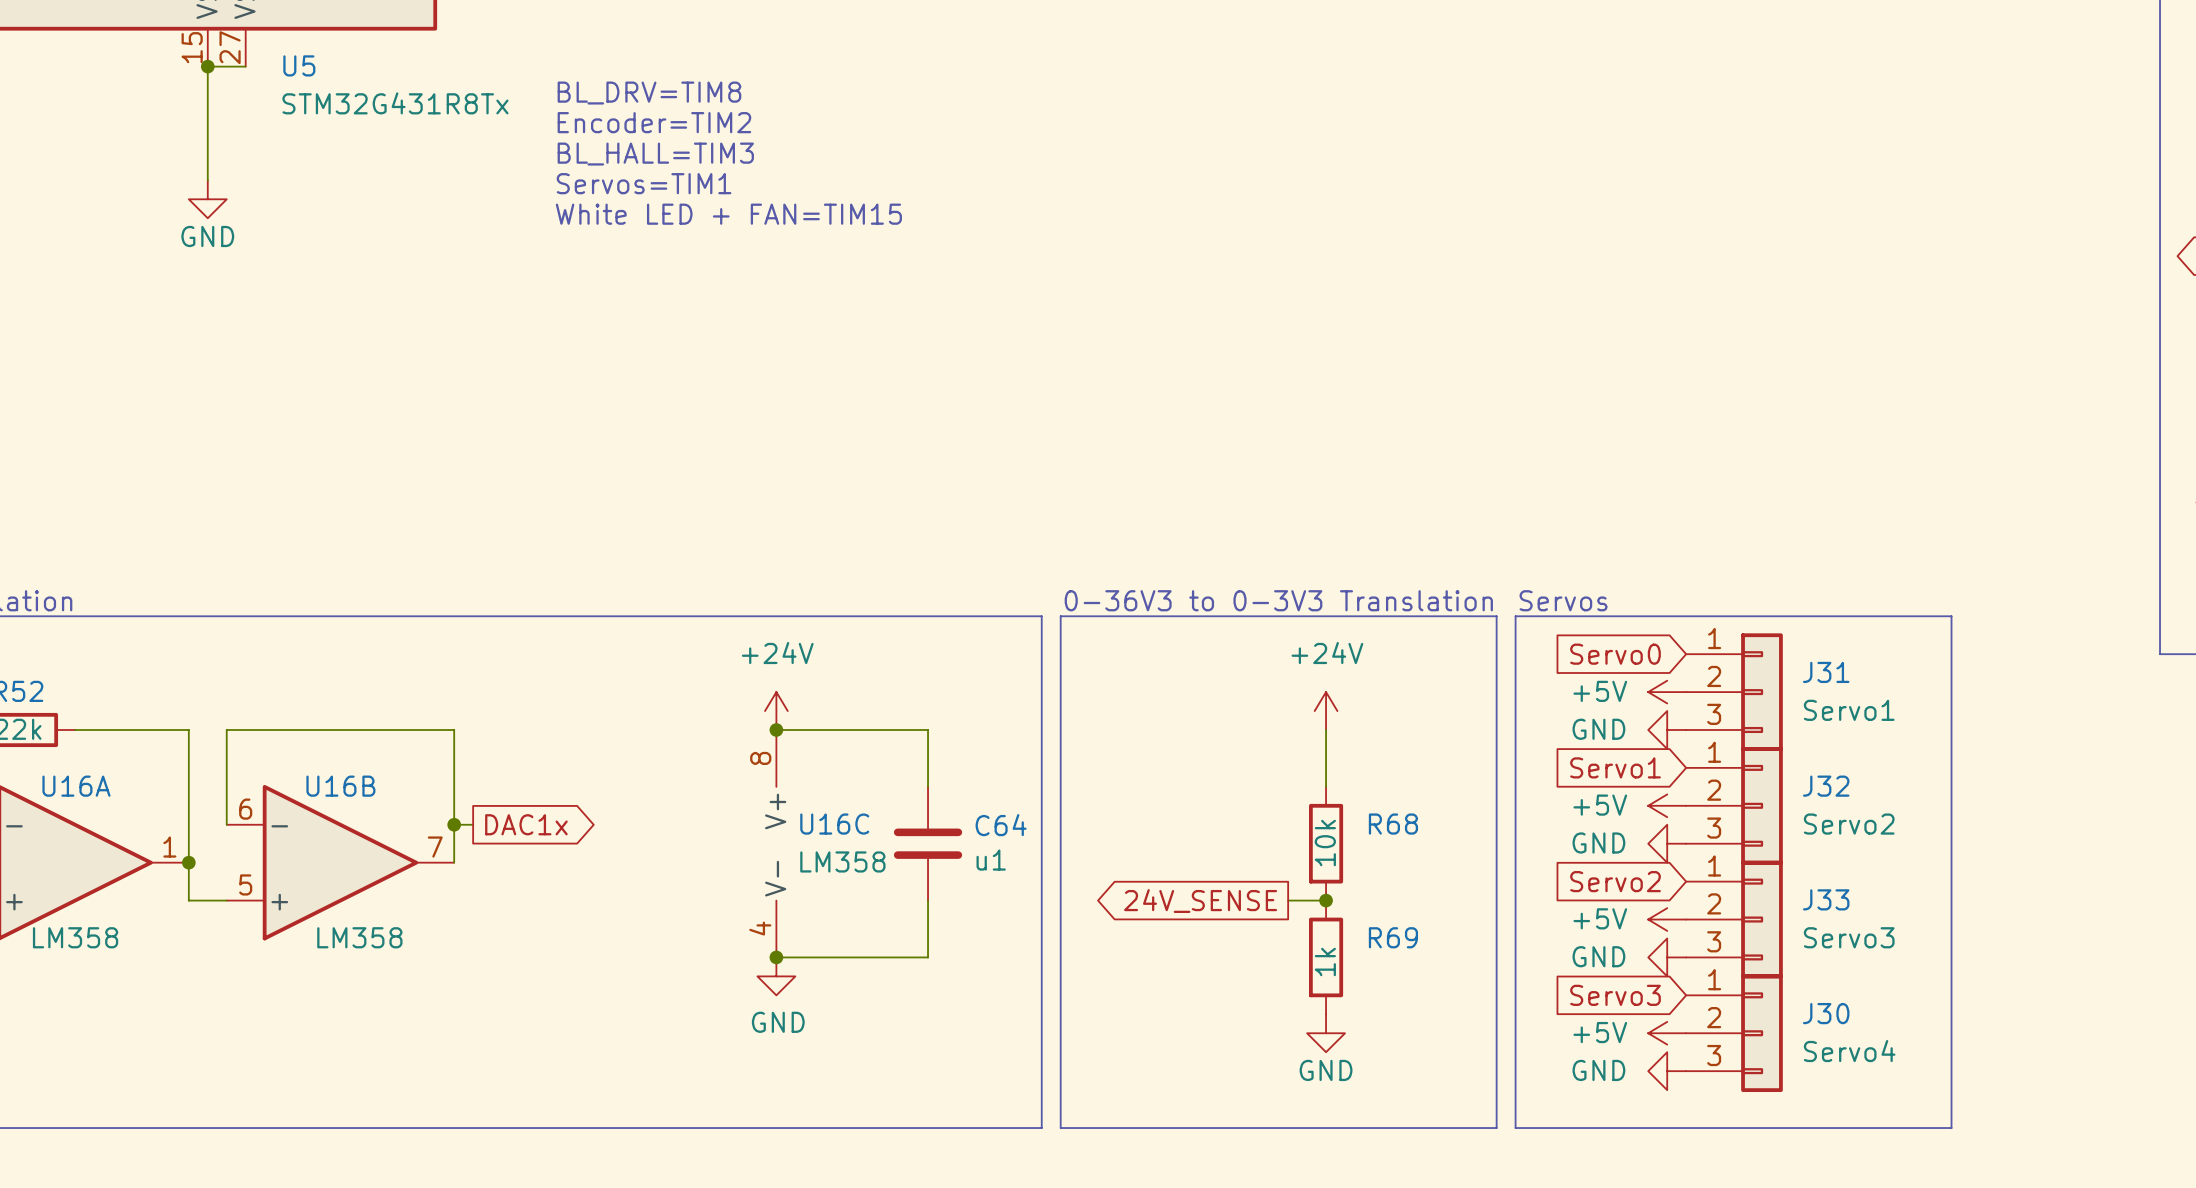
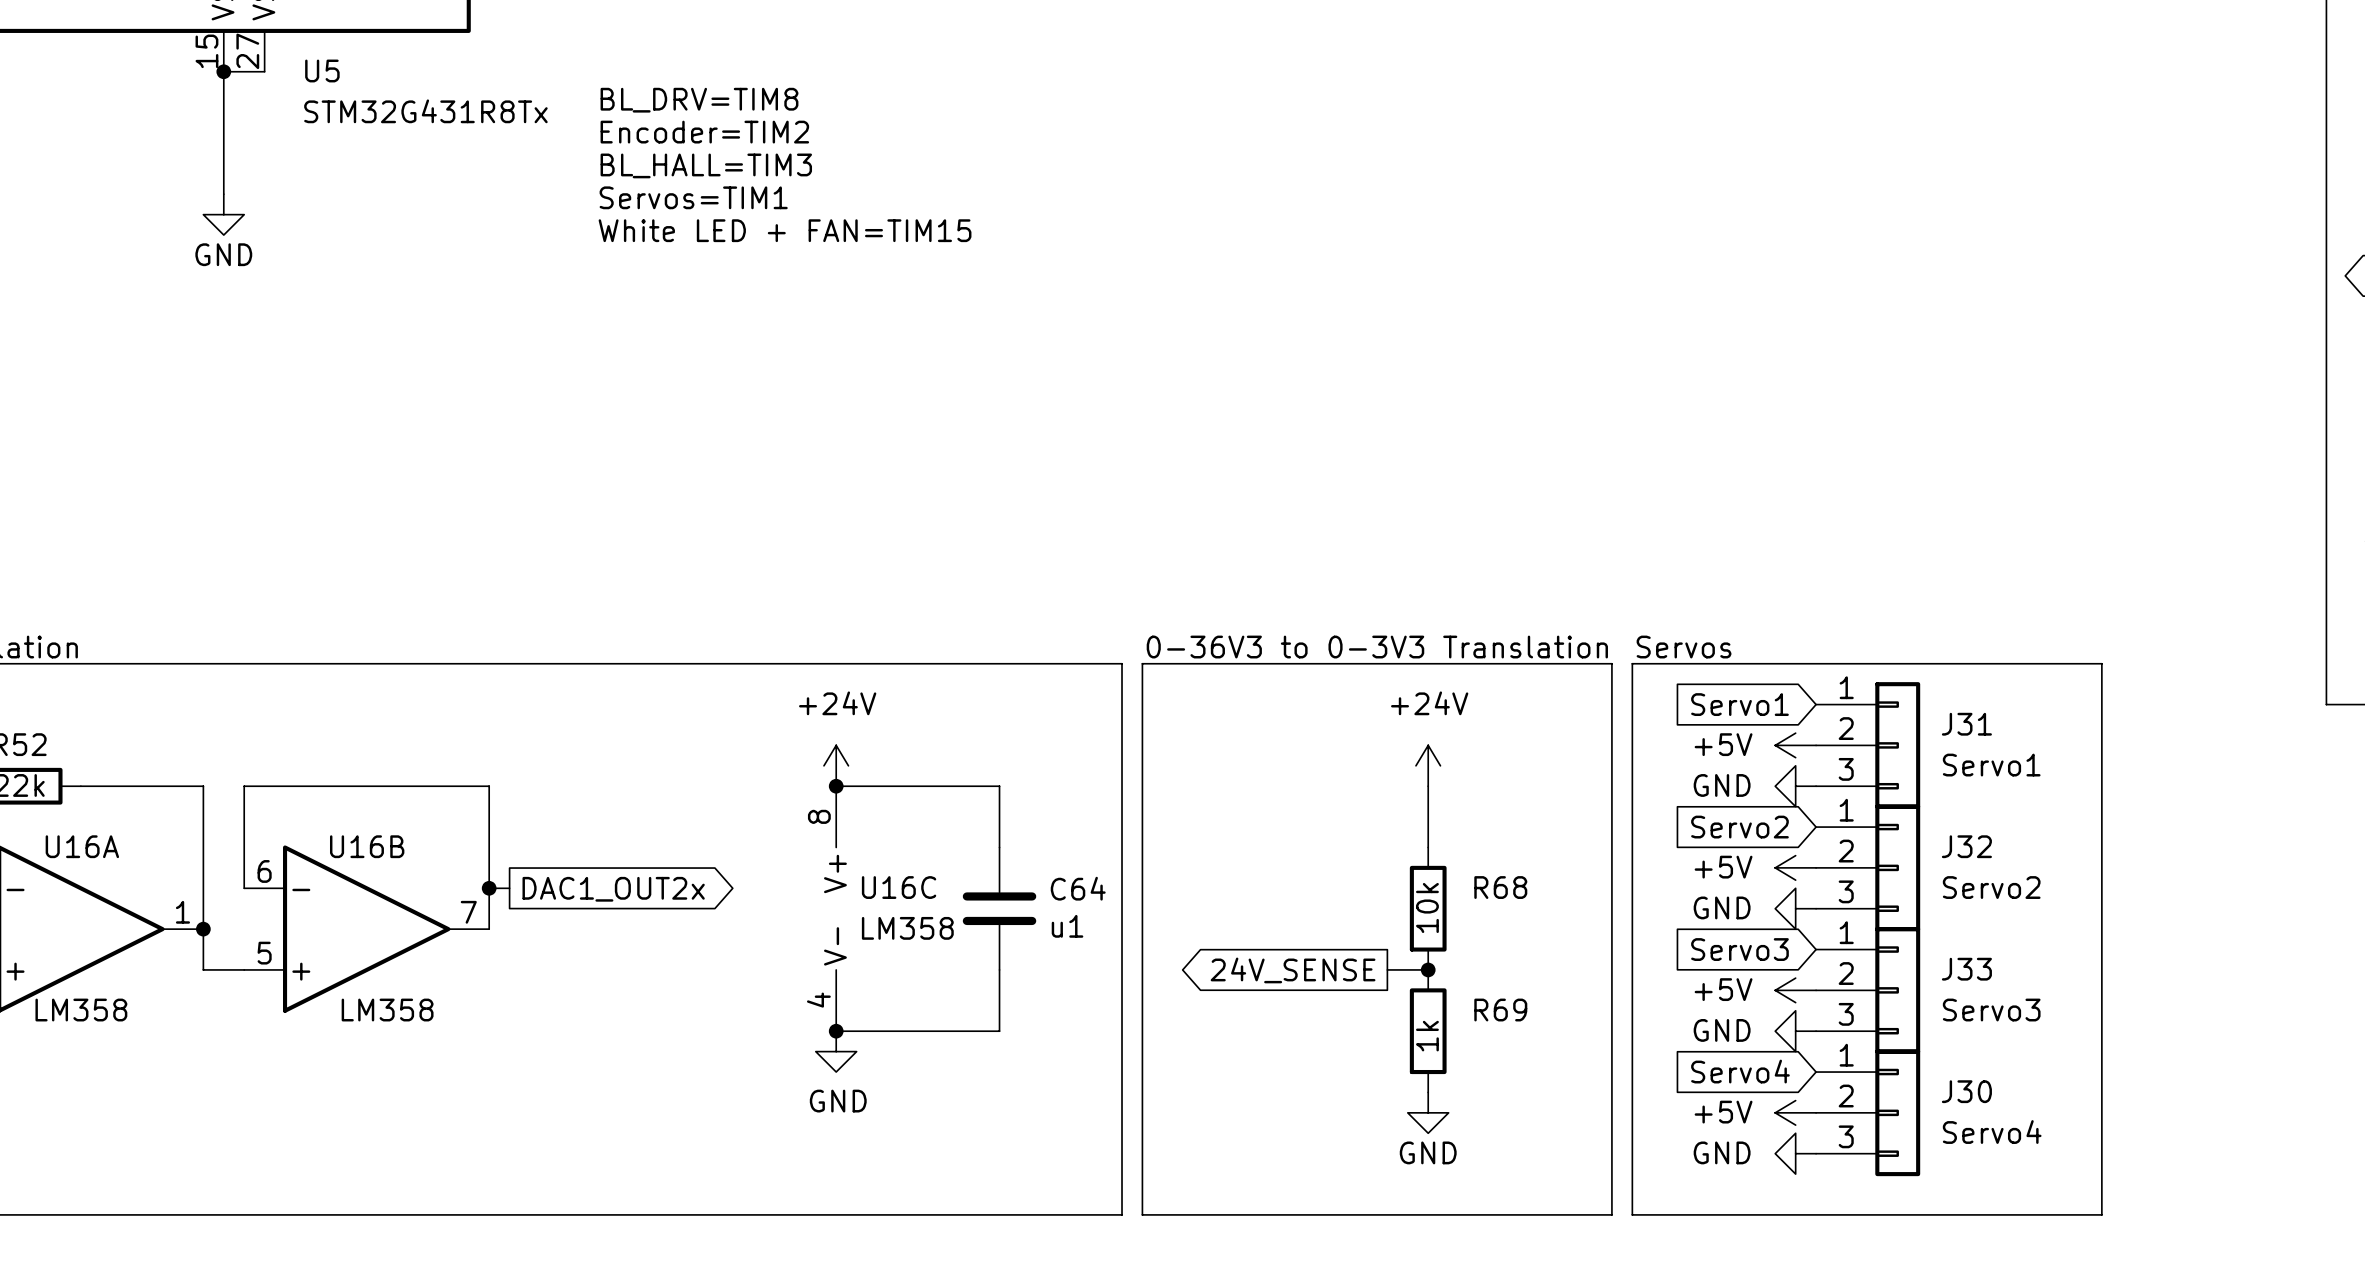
global label: Servo0 (1615, 654) -> Servo1 (1739, 704)
global label: Servo1 (1615, 767) -> Servo2 (1739, 827)
global label: DAC1x (526, 824) -> DAC1_OUT2x (613, 889)
global label: Servo2 (1615, 881) -> Servo3 (1739, 949)
global label: Servo3 (1615, 995) -> Servo4 (1740, 1071)

